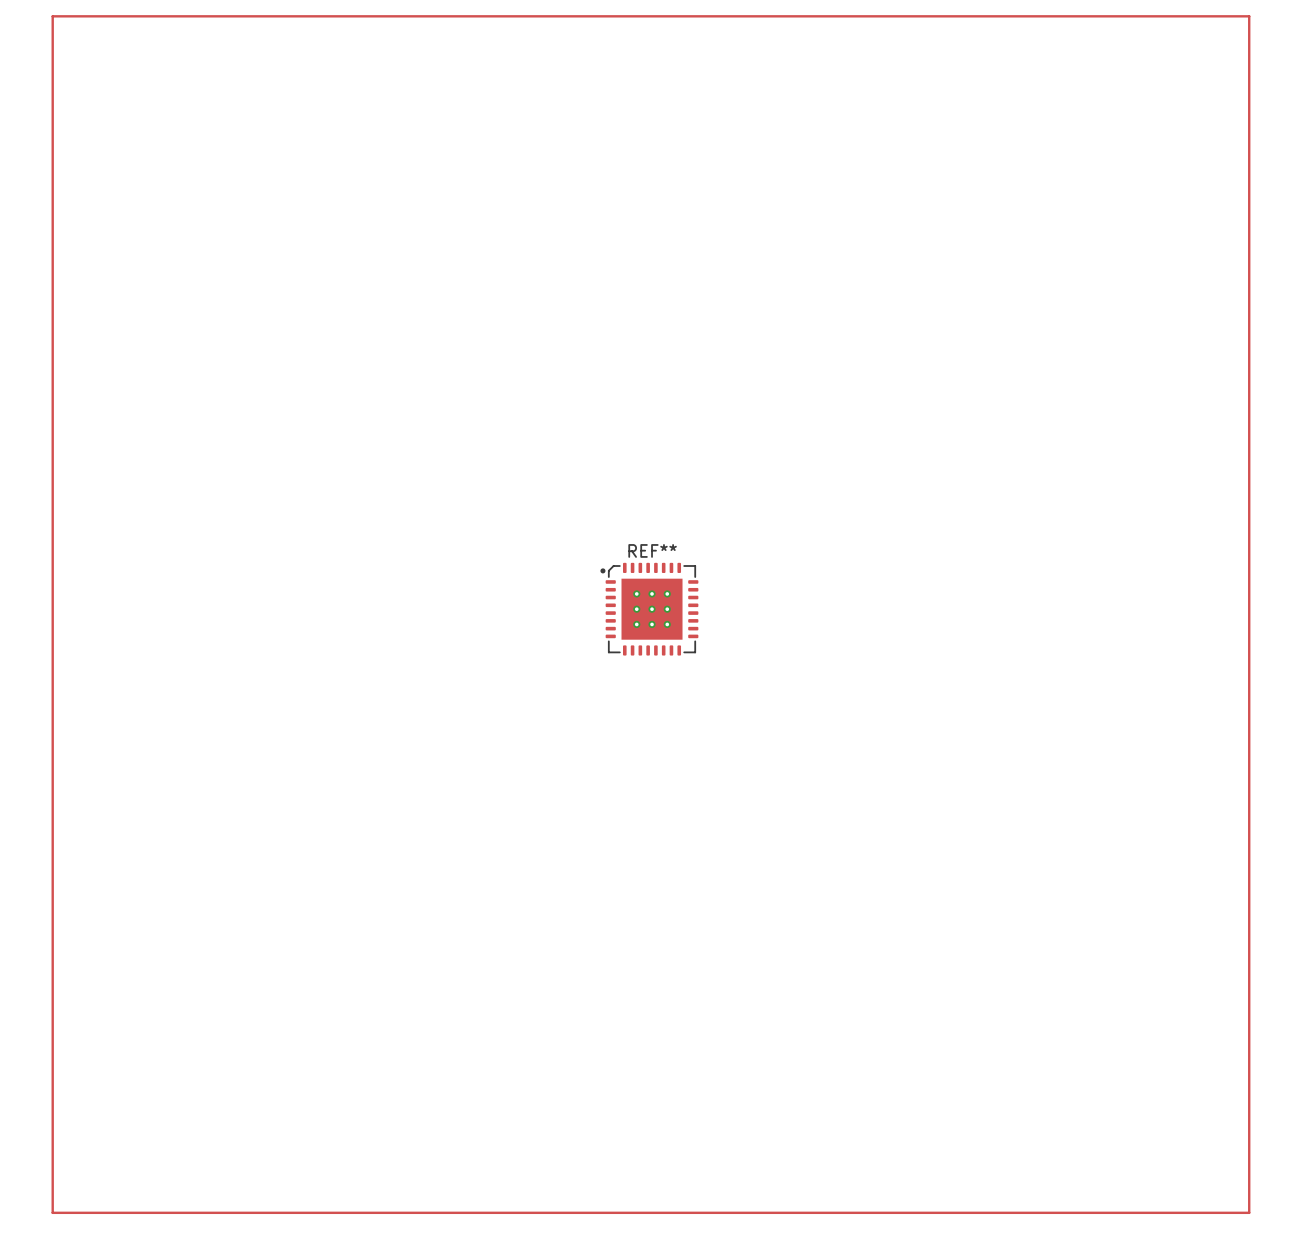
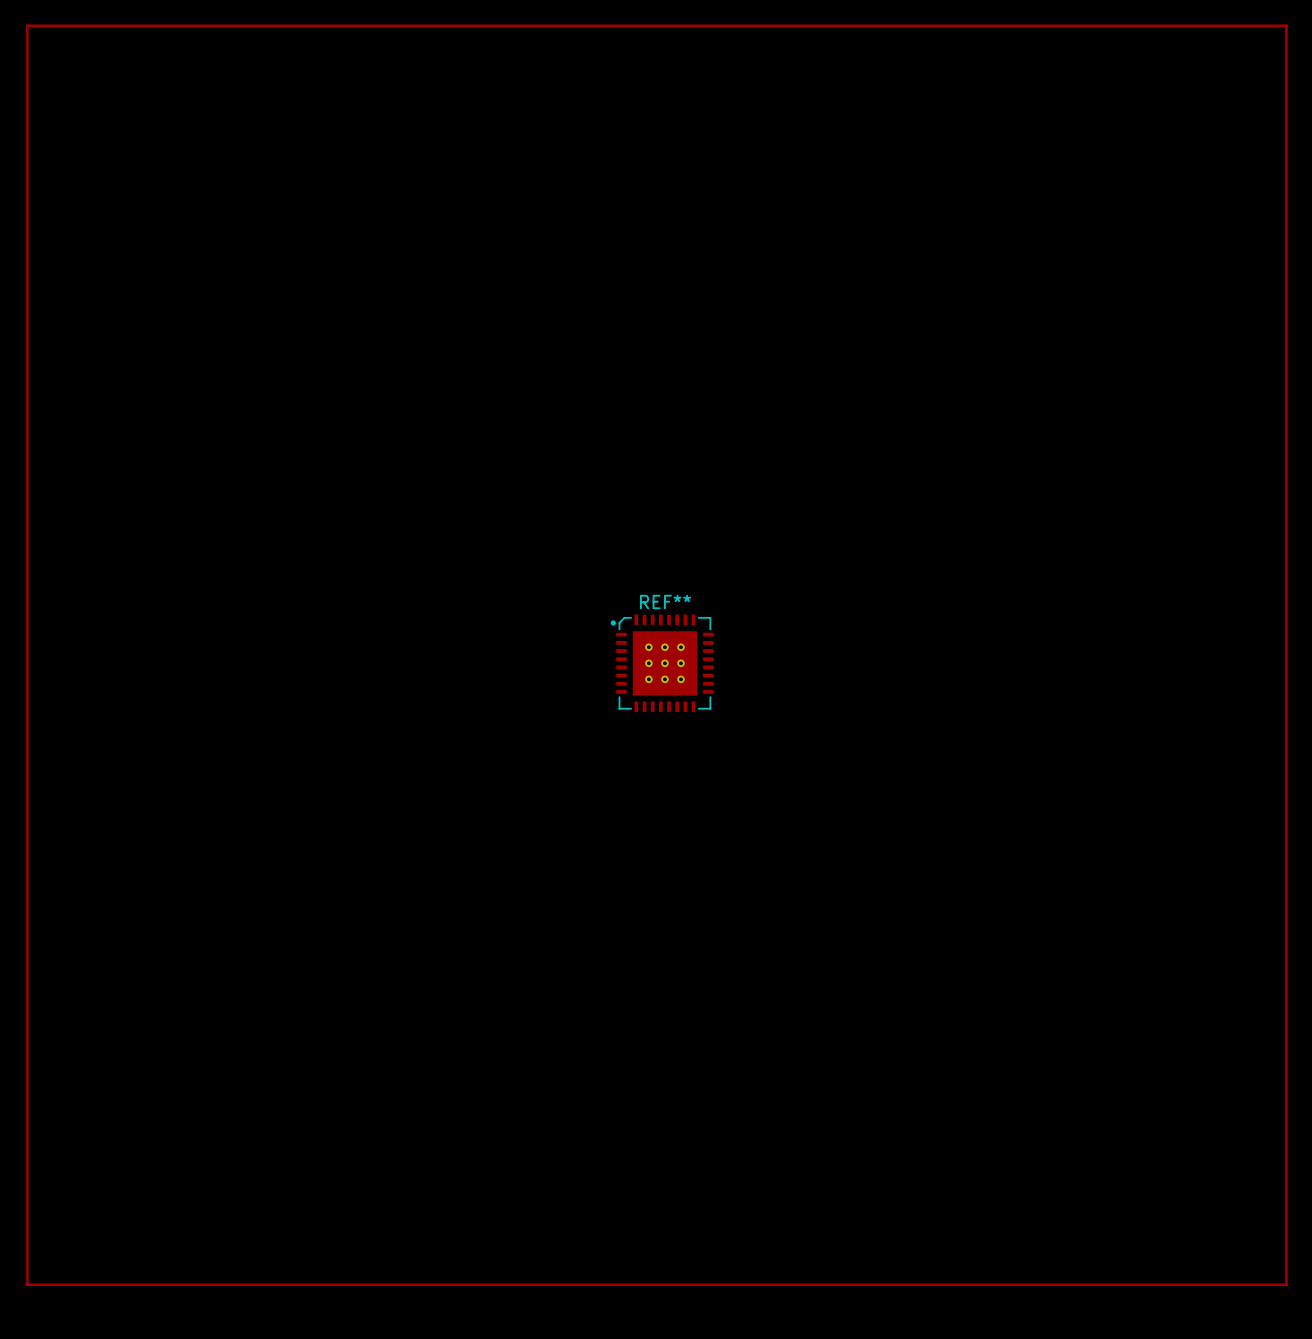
REF** position: (649, 609) -> (662, 663)

